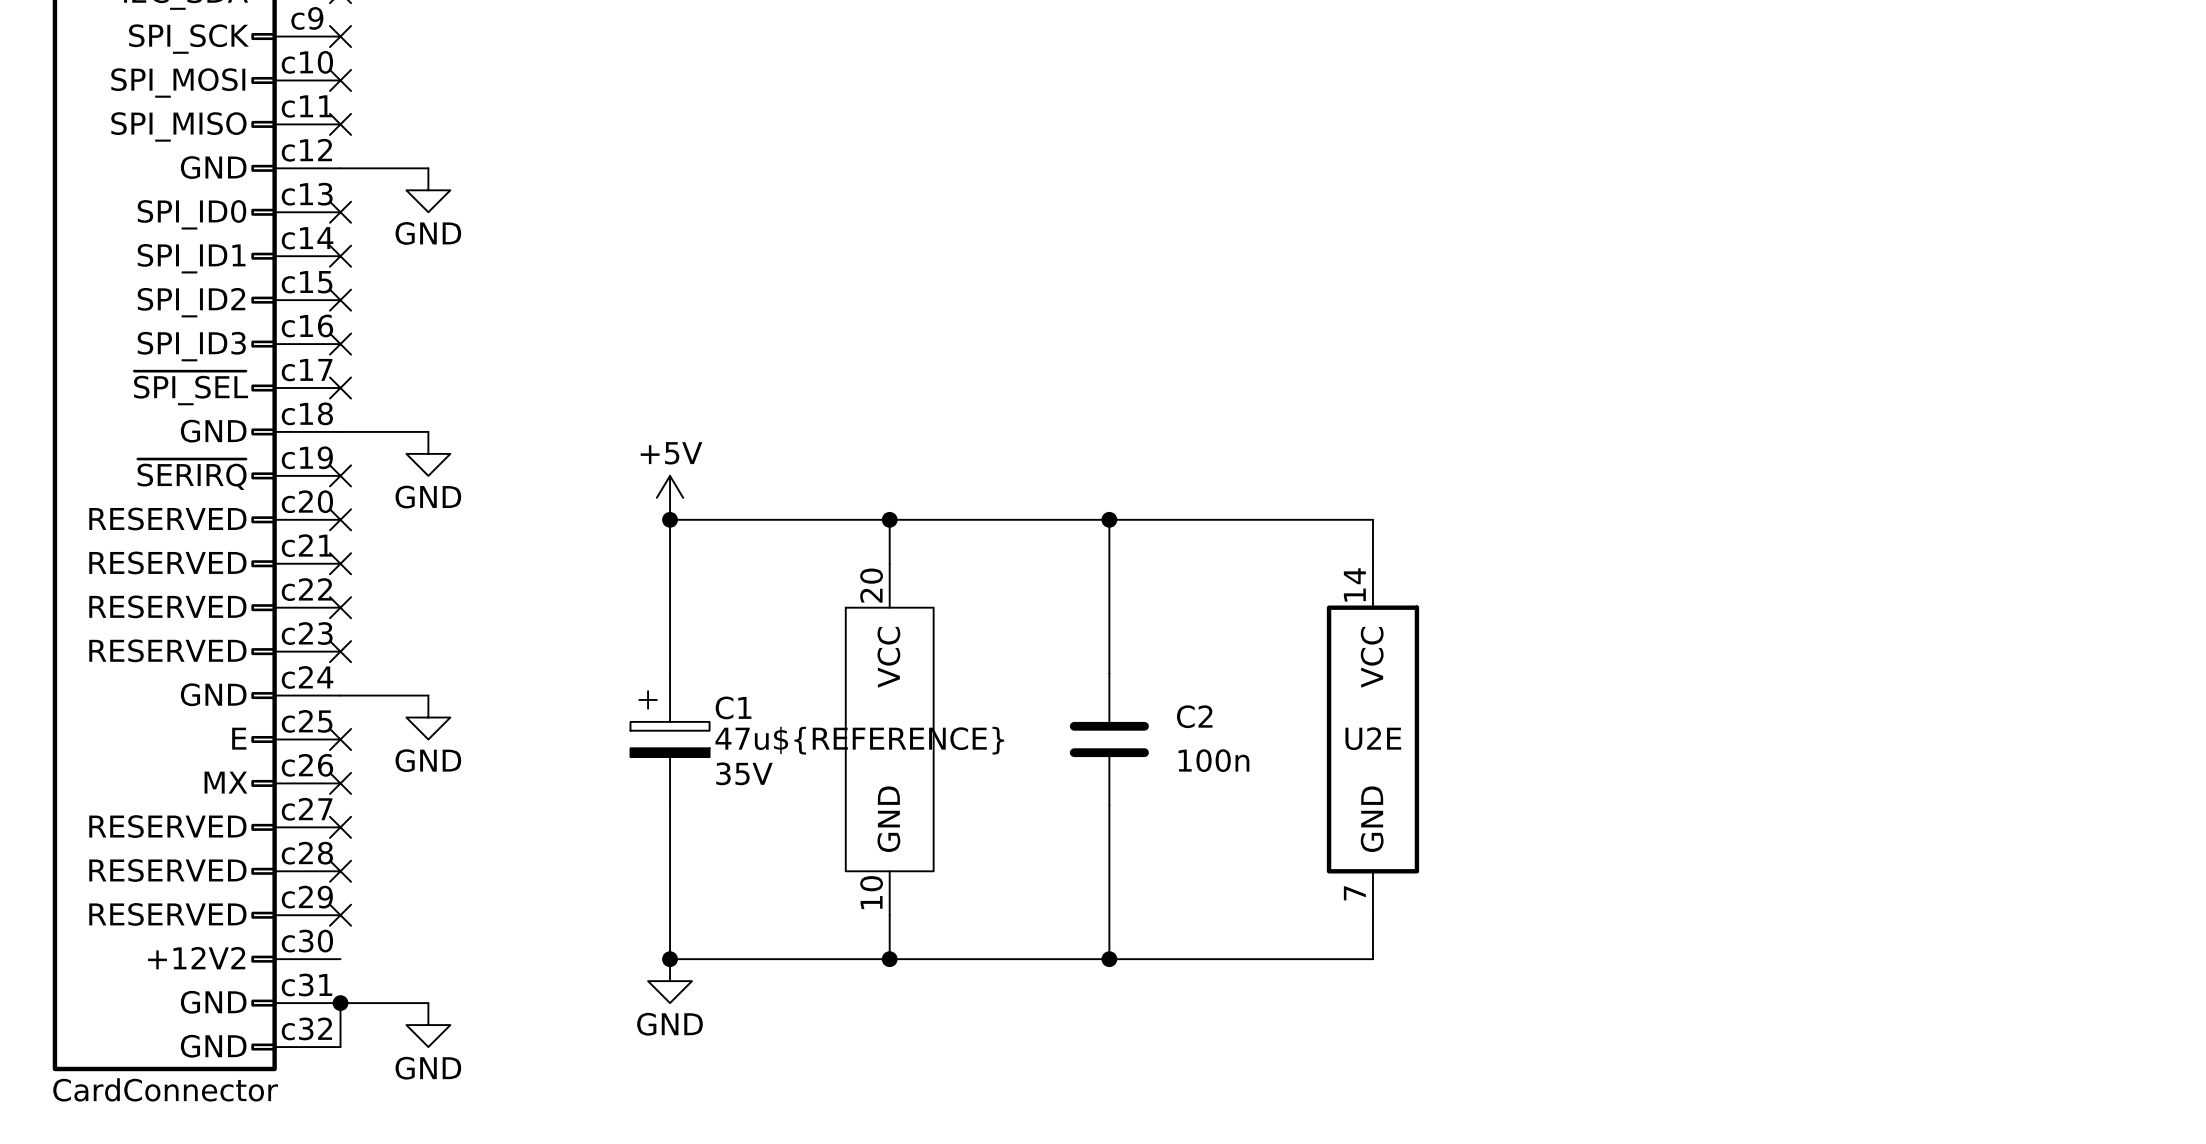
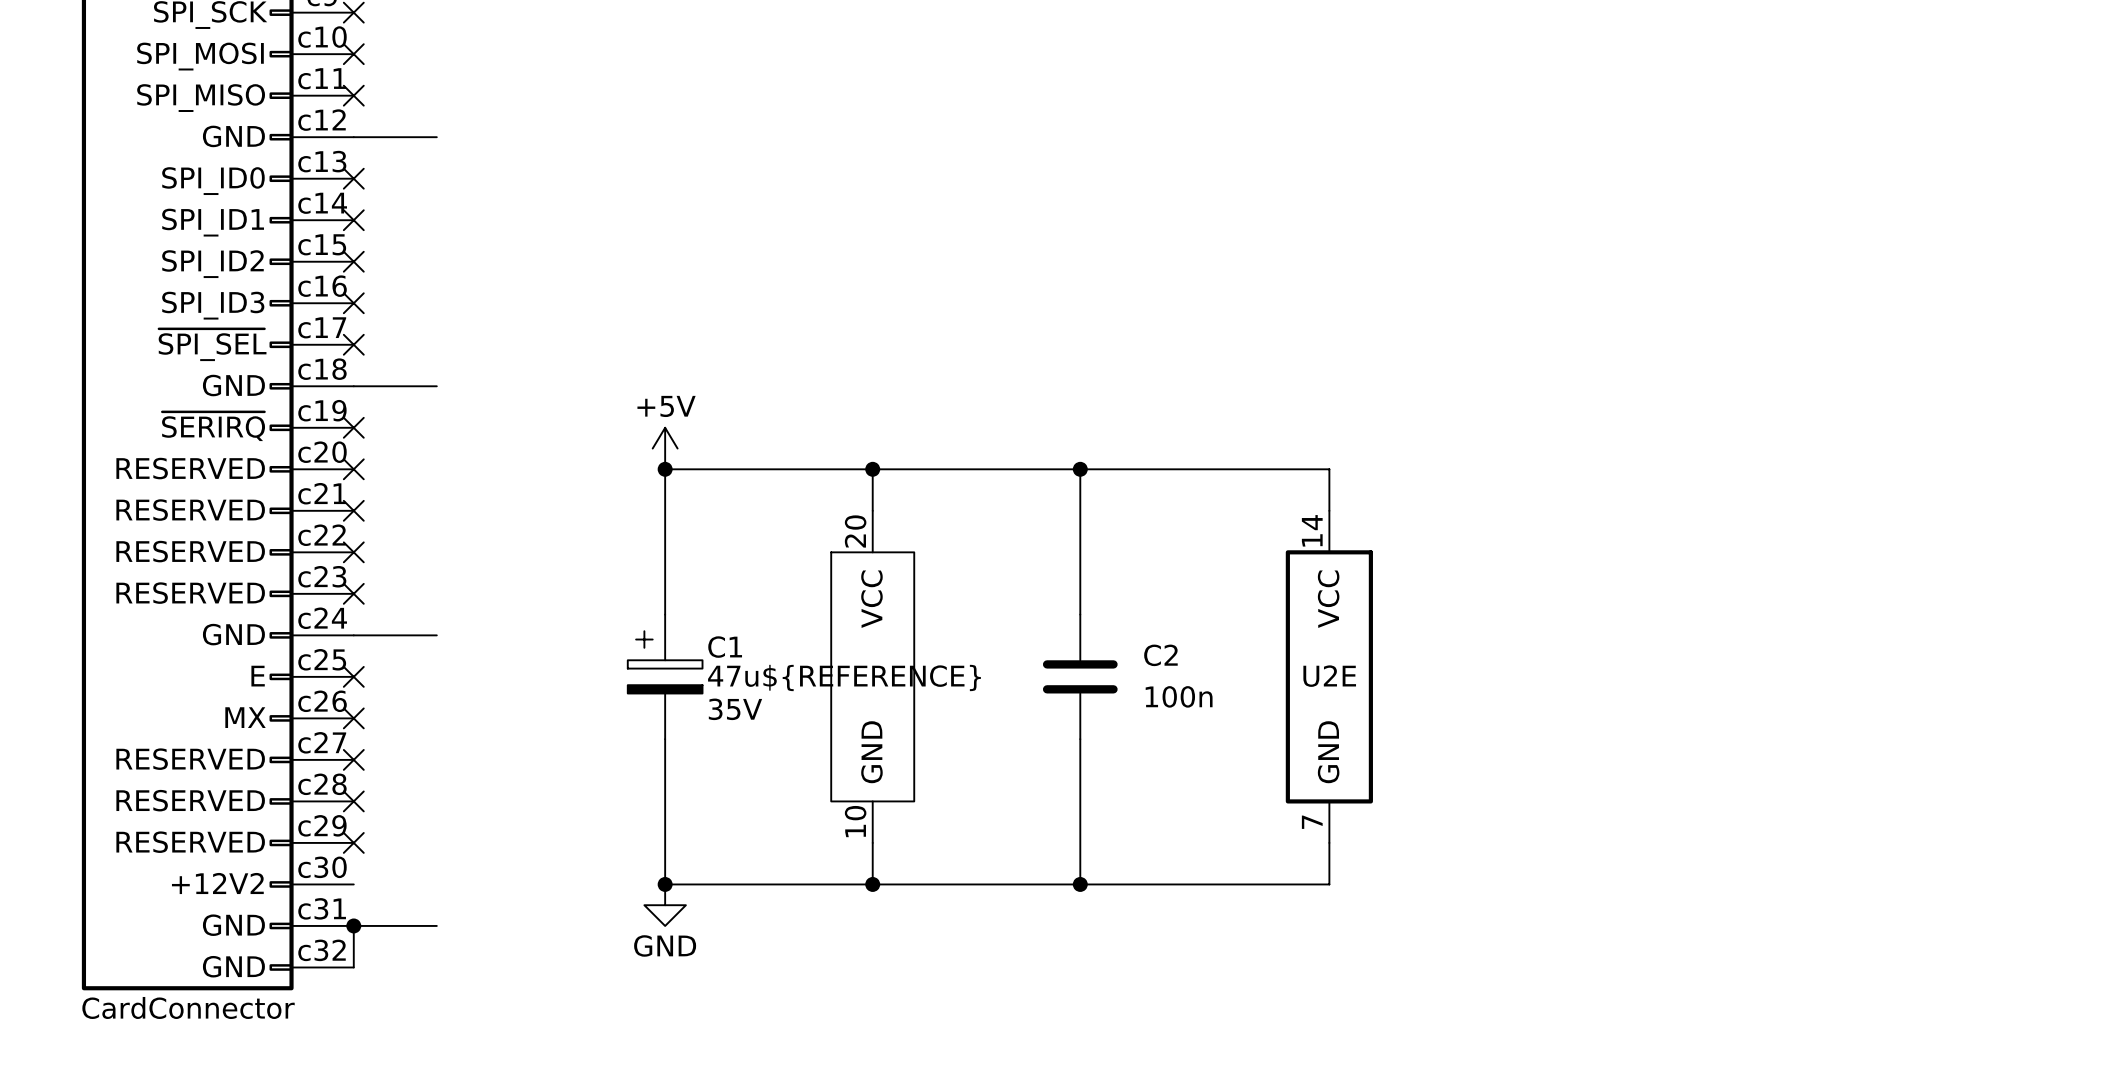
power symbol: GND (428, 190) -> none
power symbol: GND (428, 453) -> none
power symbol: GND (428, 717) -> none
power symbol: GND (428, 1025) -> none

